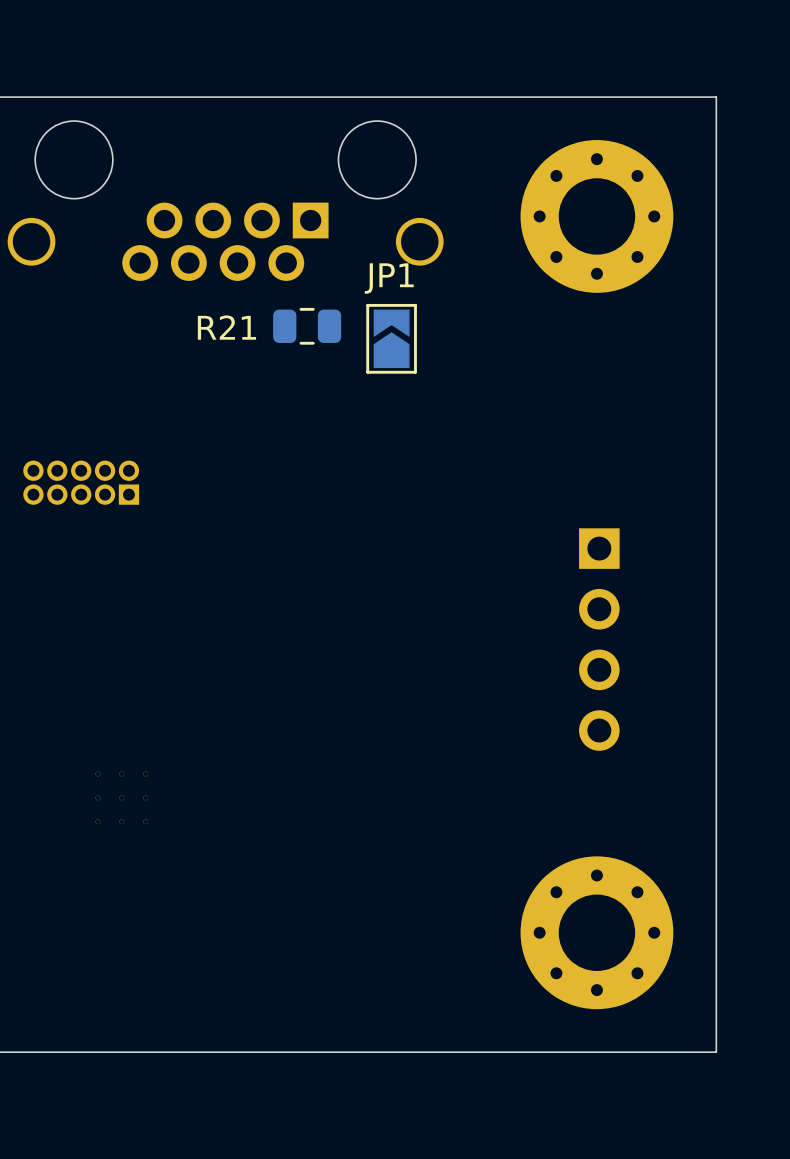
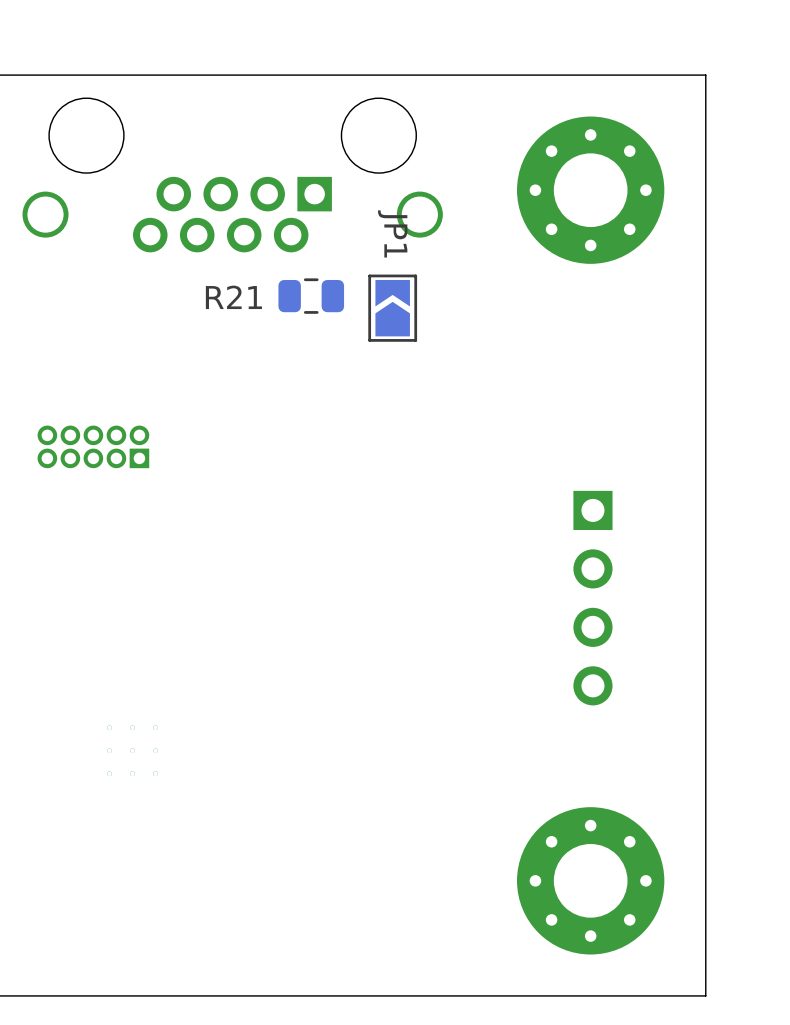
JP1 name rotation: 0° (389, 278) -> 90° clockwise (392, 233)

